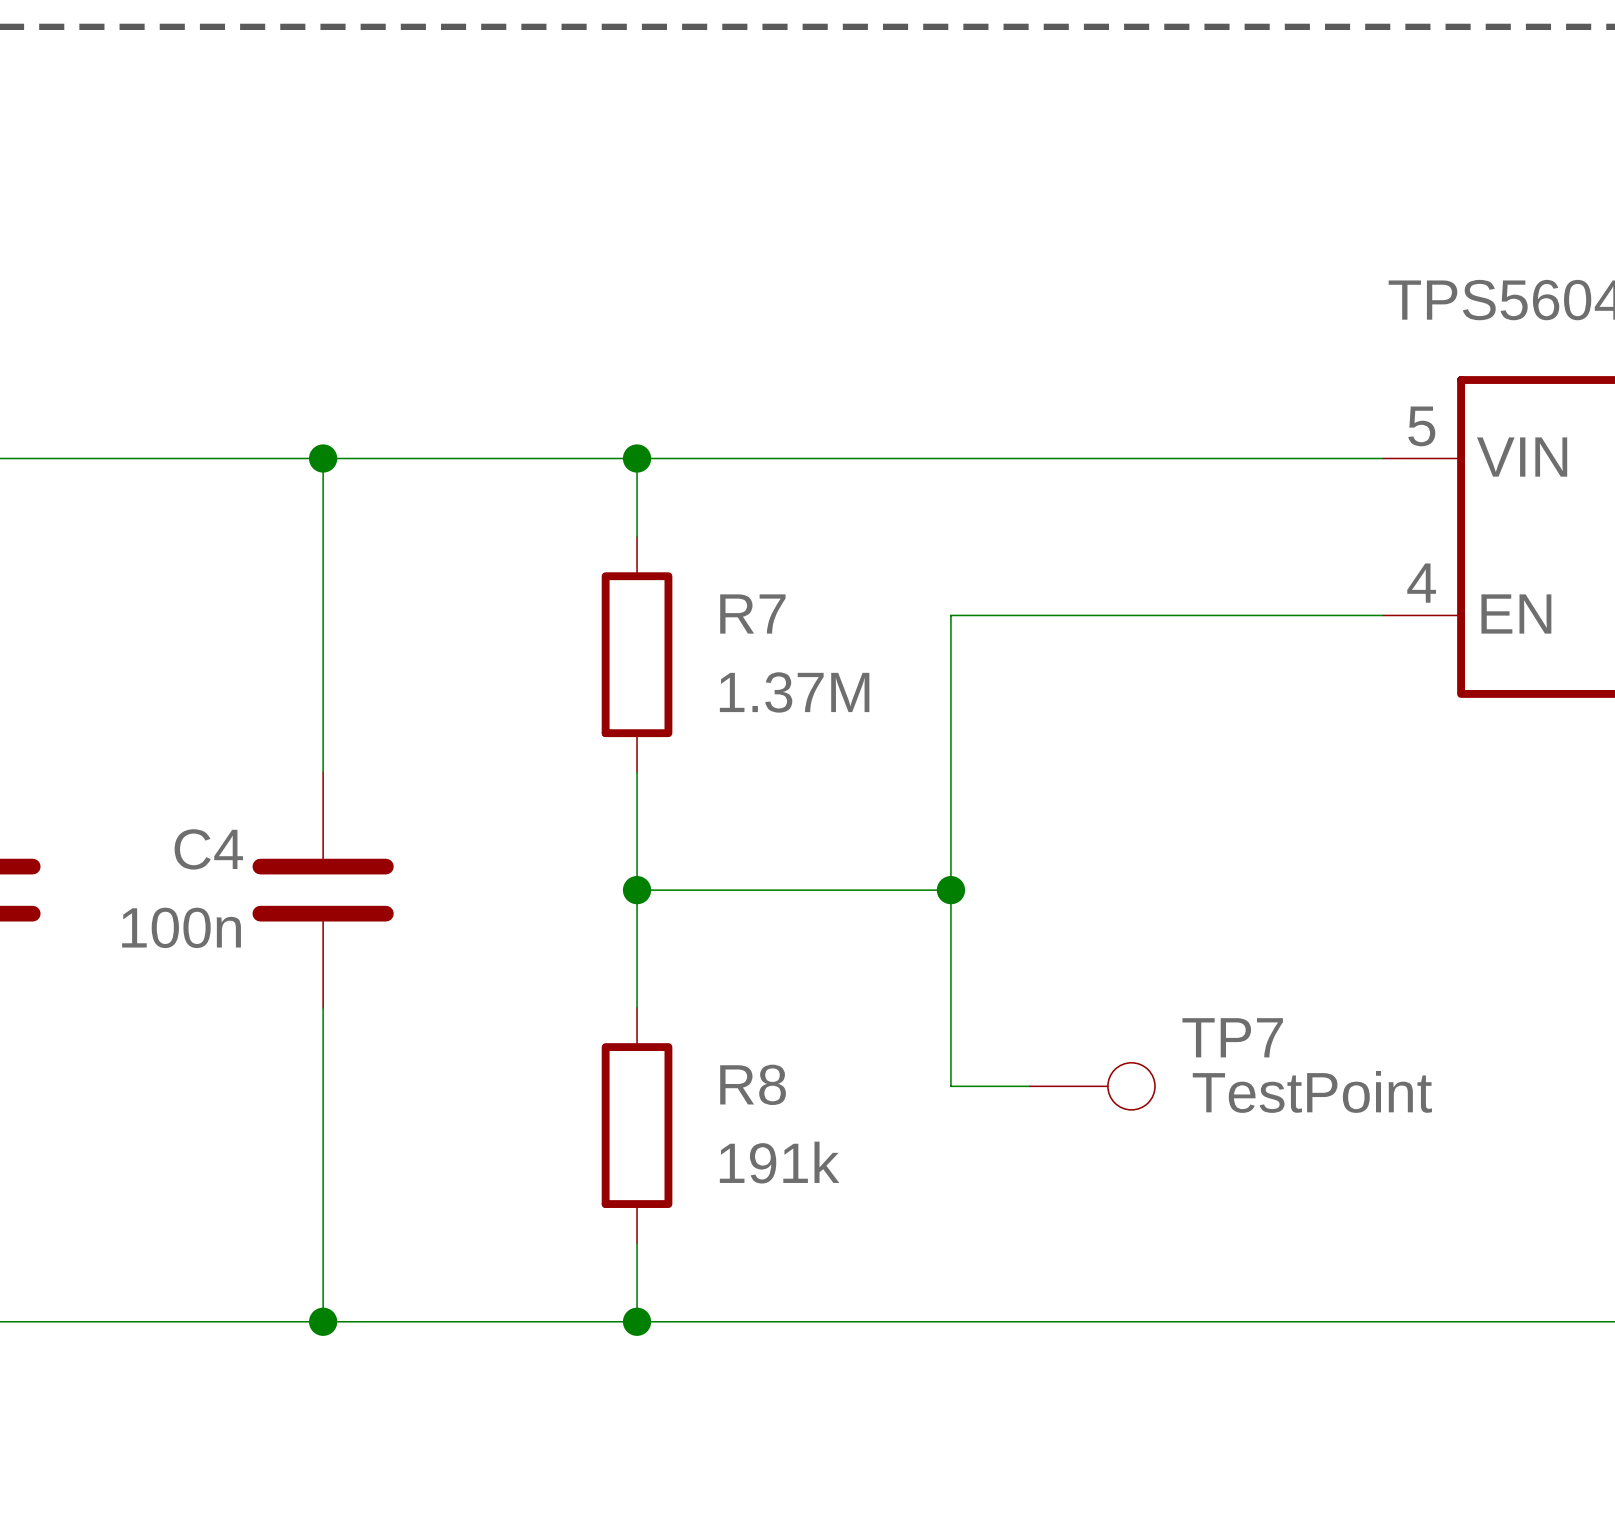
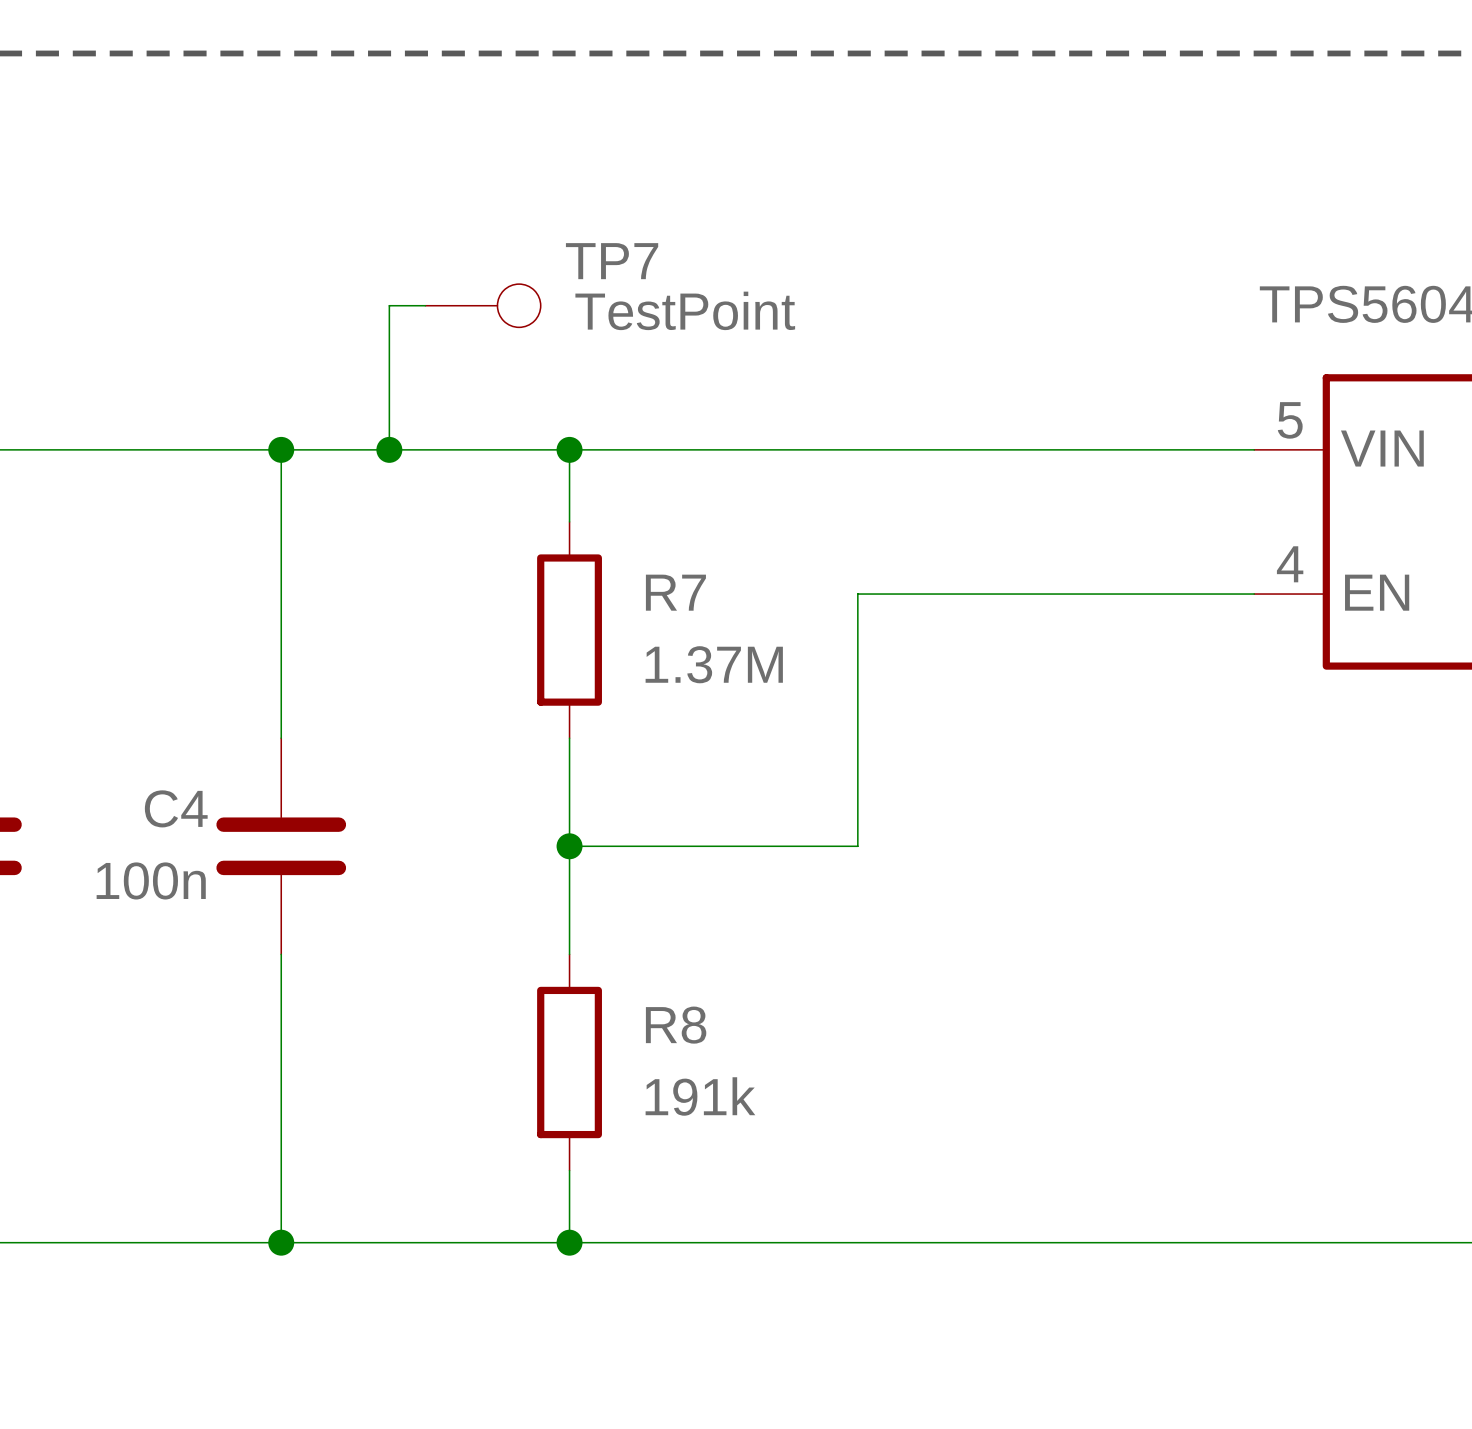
wire: none -> (425, 305) (389, 305) (389, 449)
junction: none -> (389, 449)
wire: (950, 890) (950, 1086) (1029, 1086) -> none
junction: (950, 890) -> none
TP7 position: (1092, 1086) -> (483, 305)

